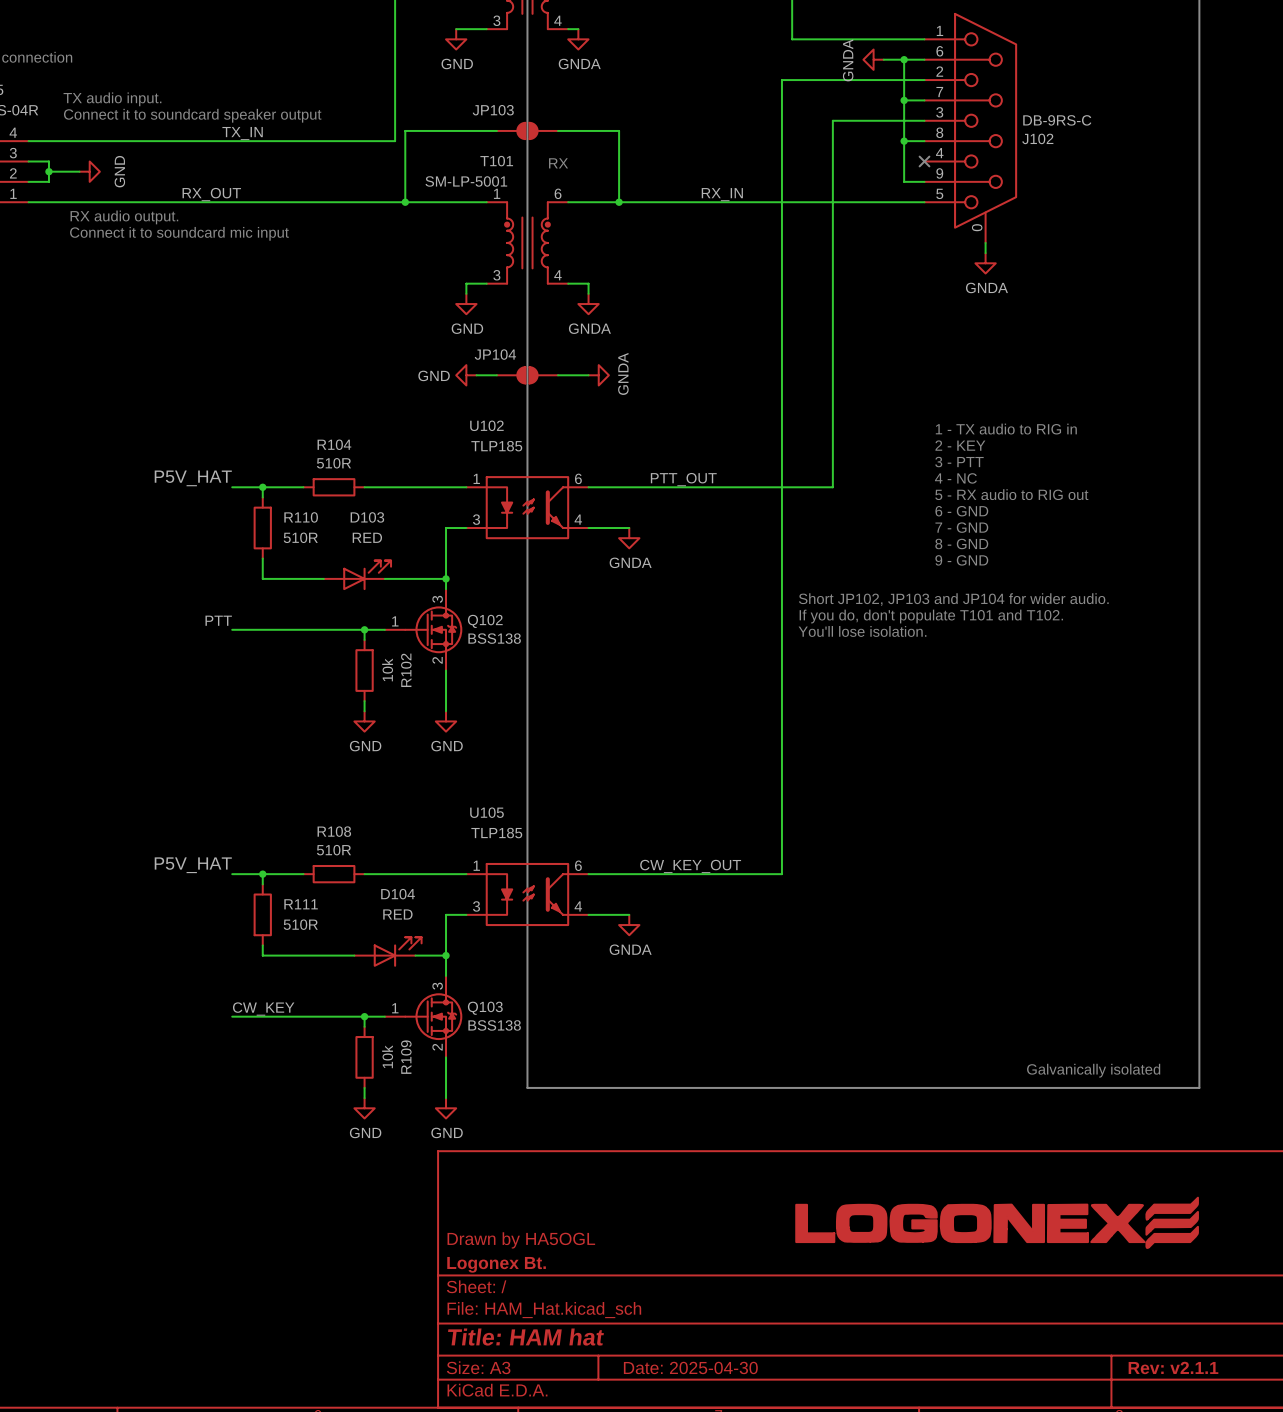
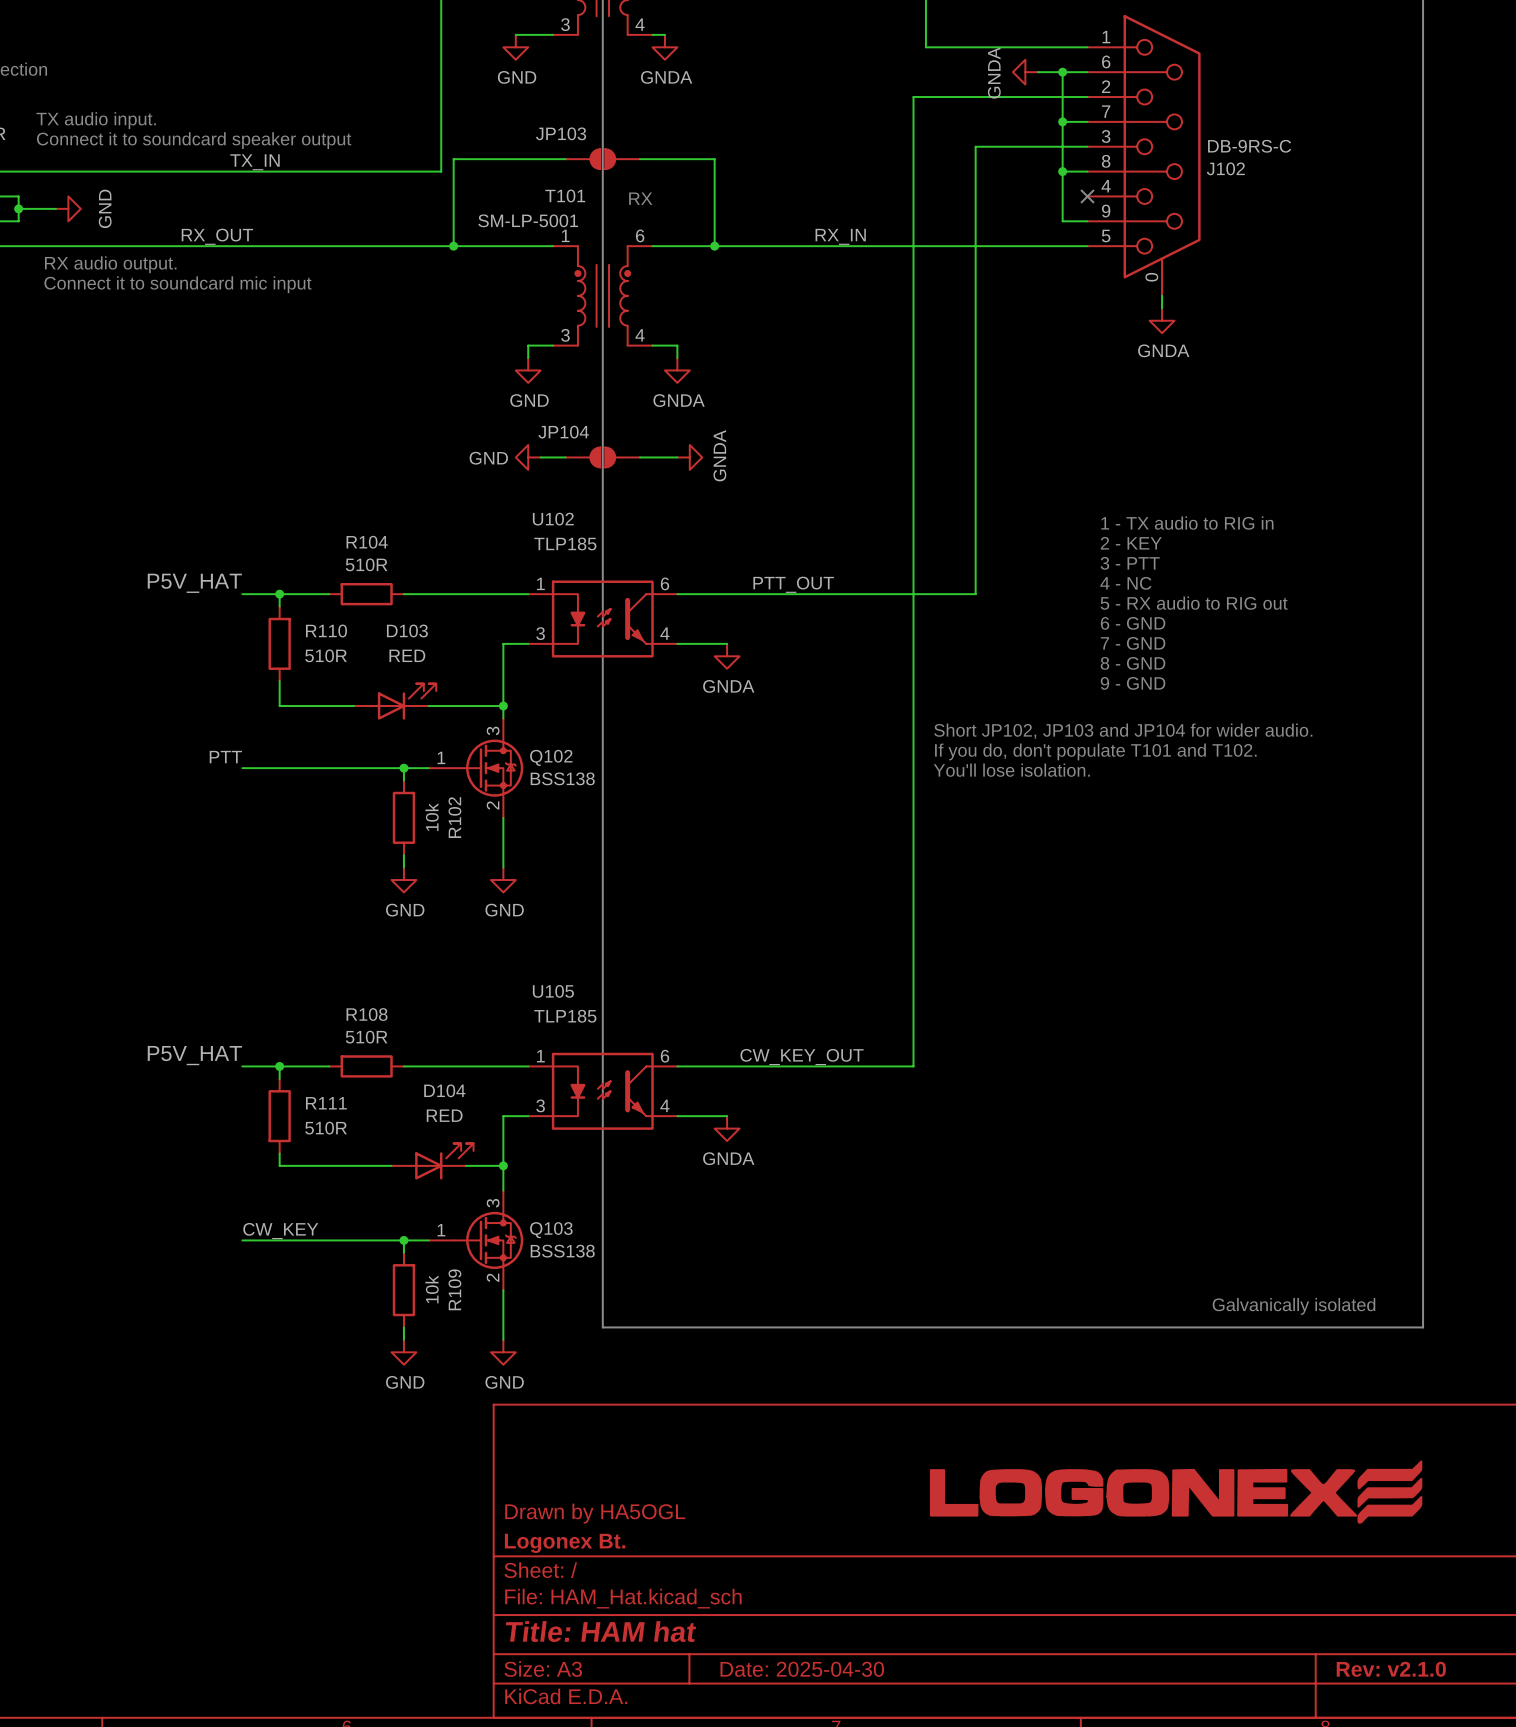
title block: Rev: v2.1.1 (1173, 1367) -> Rev: v2.1.0 (1391, 1669)

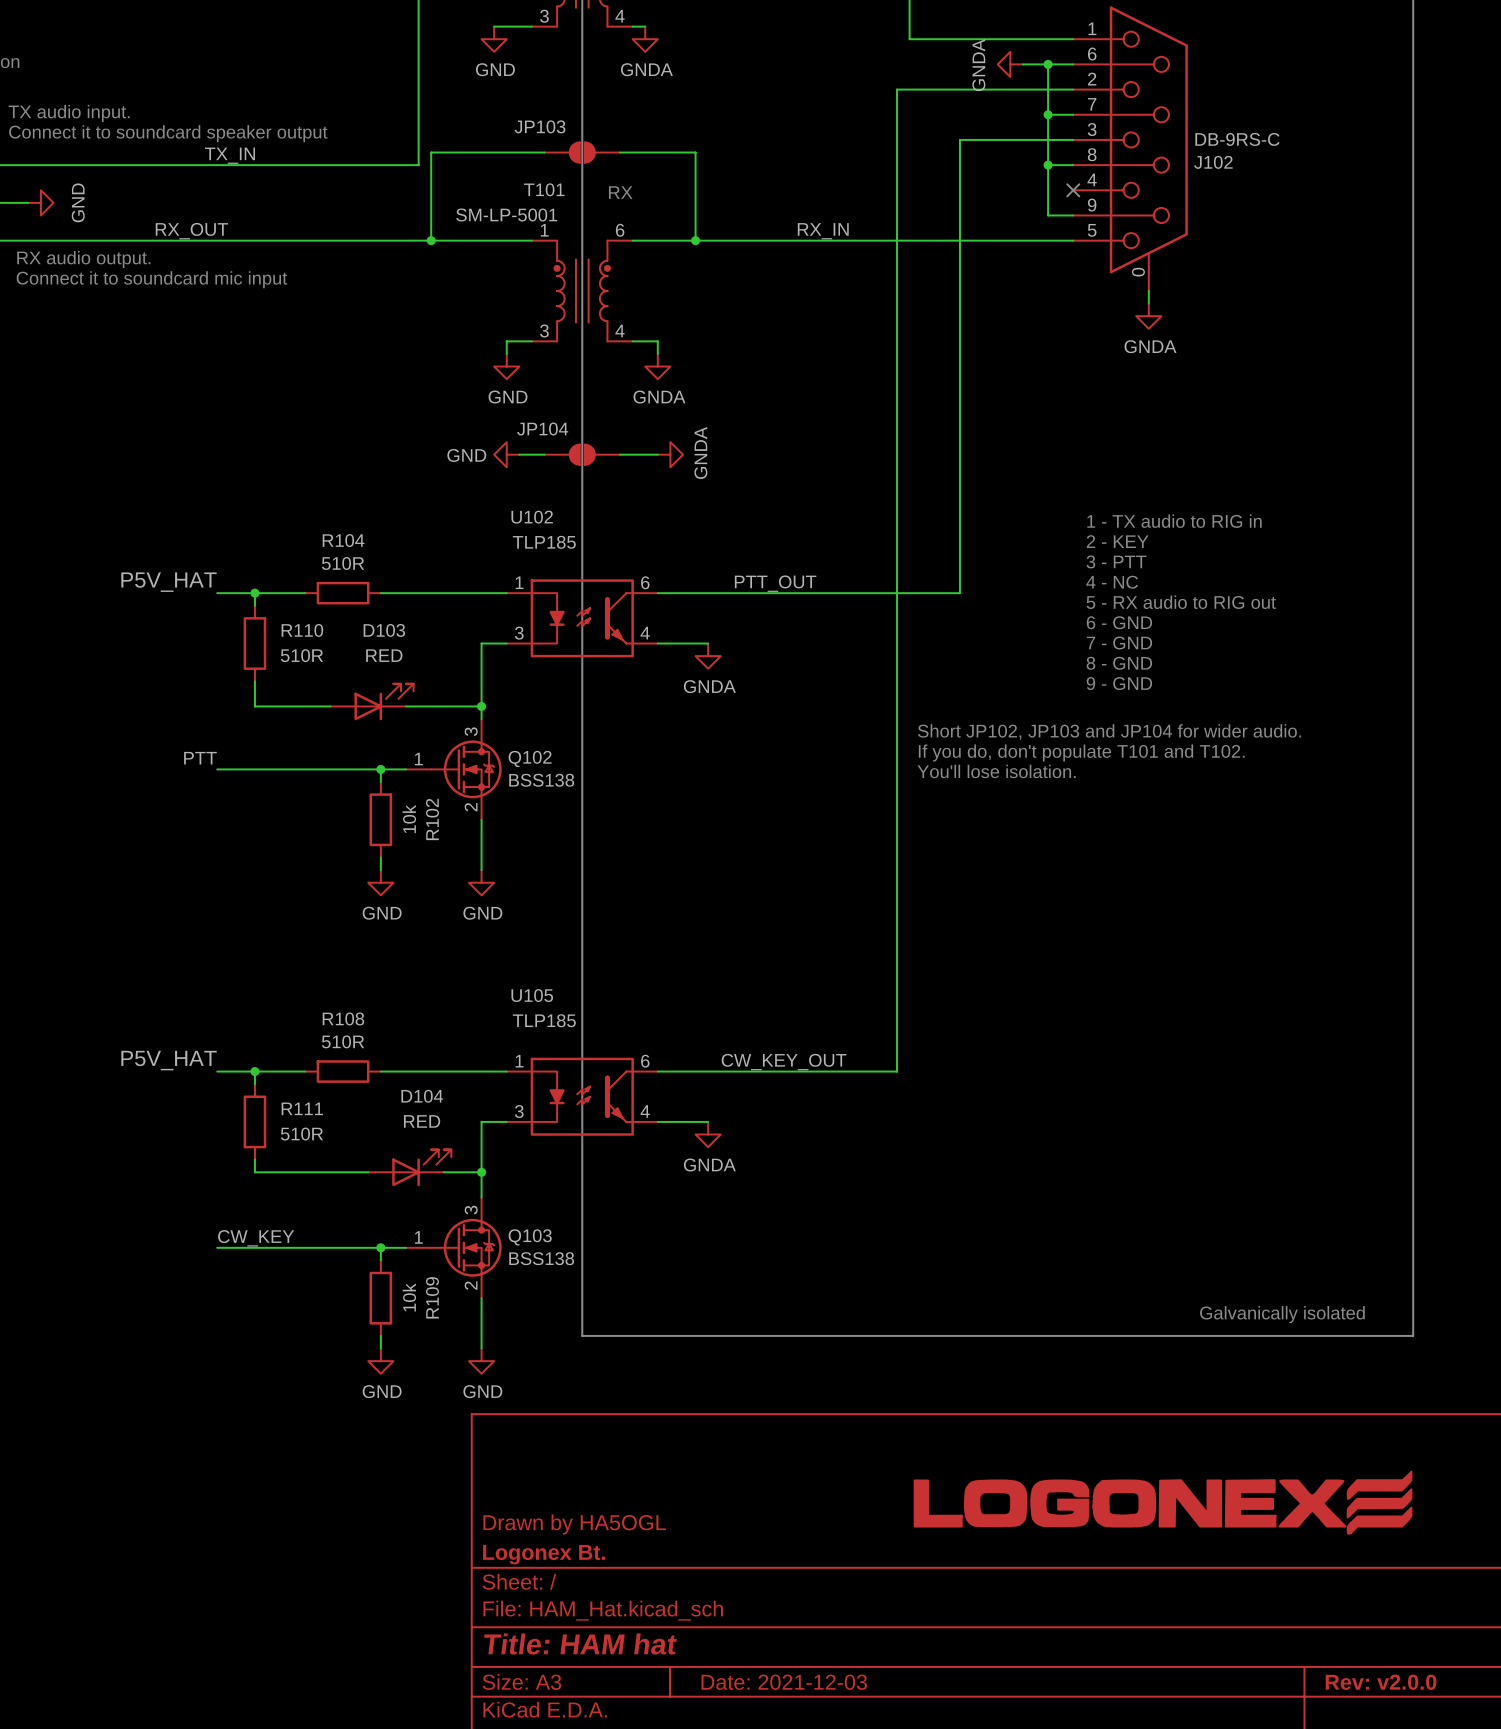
title block: Date: 2025-04-30 (802, 1669) -> Date: 2021-12-03 (784, 1682)
title block: Rev: v2.1.0 (1391, 1669) -> Rev: v2.0.0 (1381, 1682)

